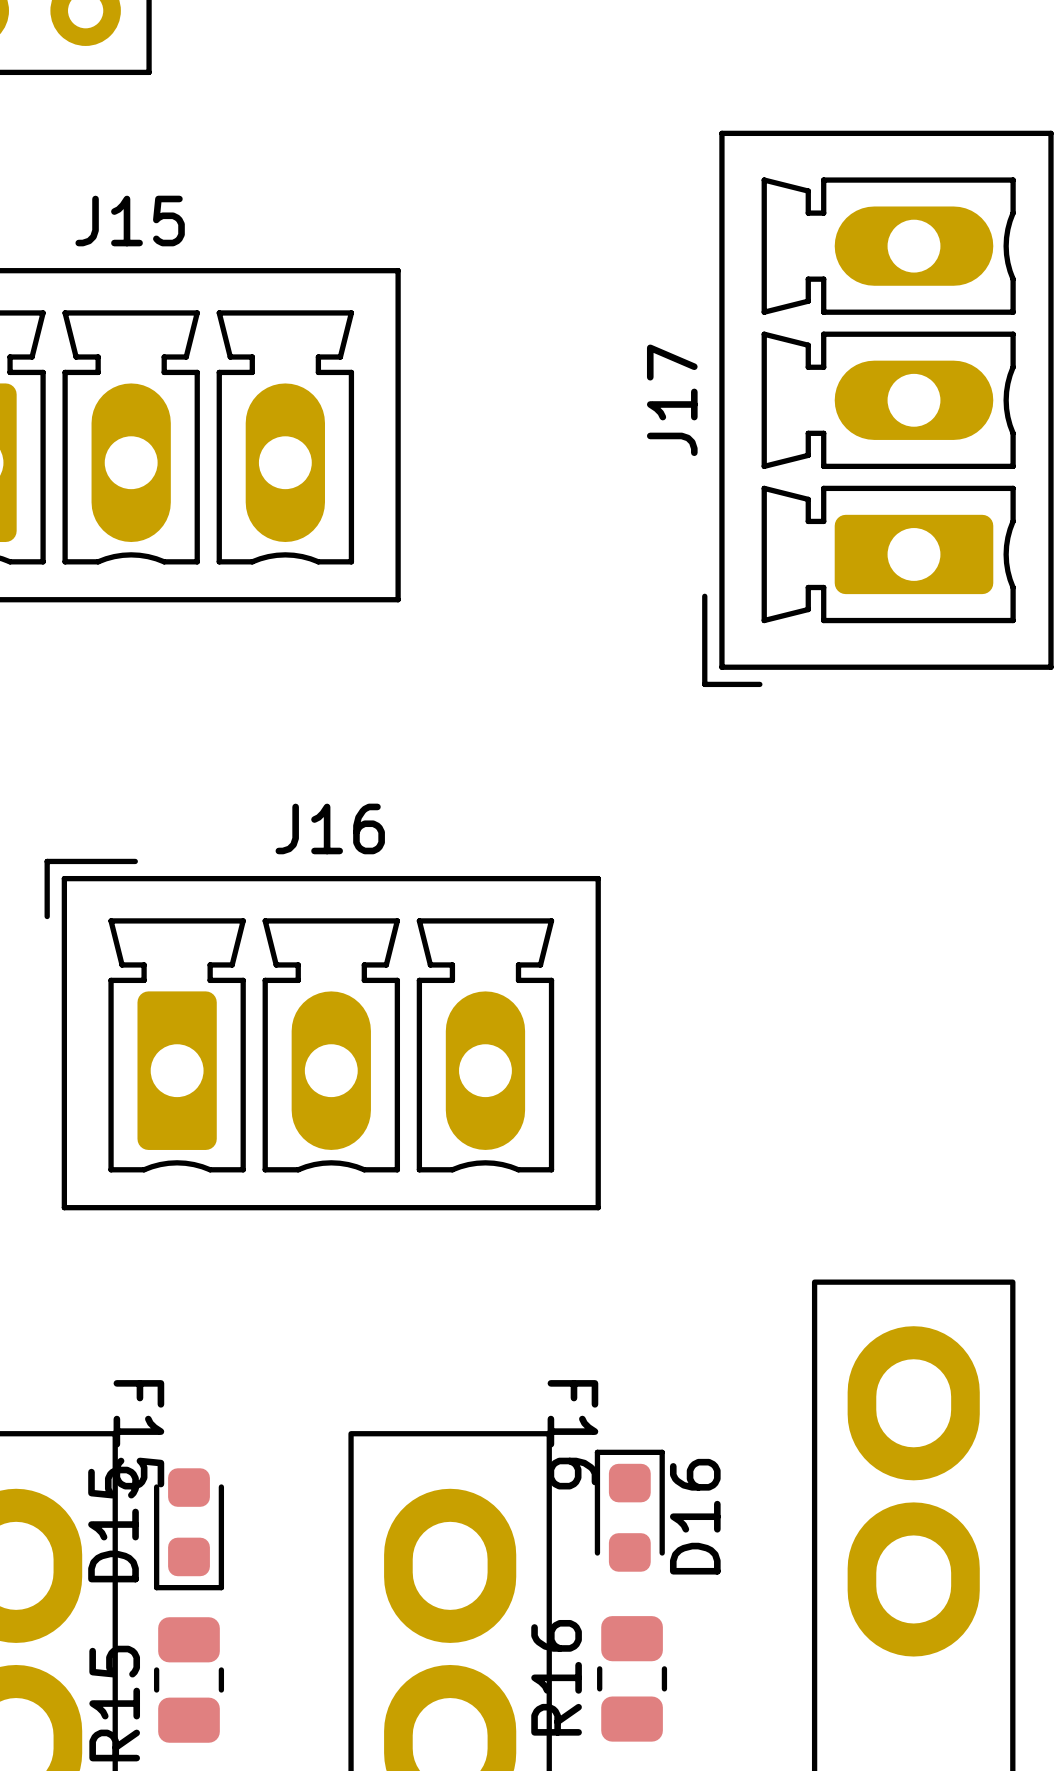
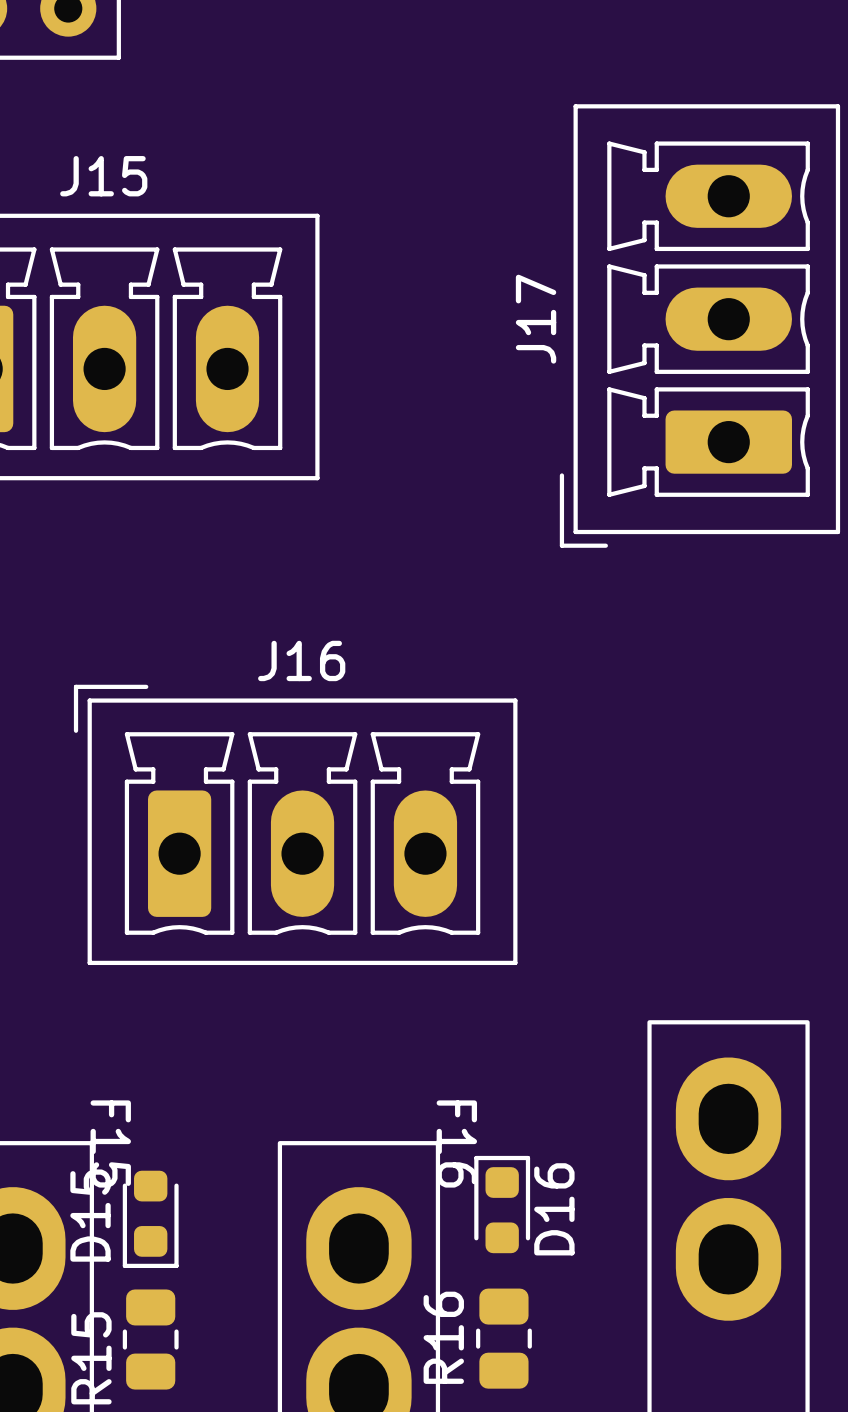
J16 position: (322, 1034) -> (295, 824)

